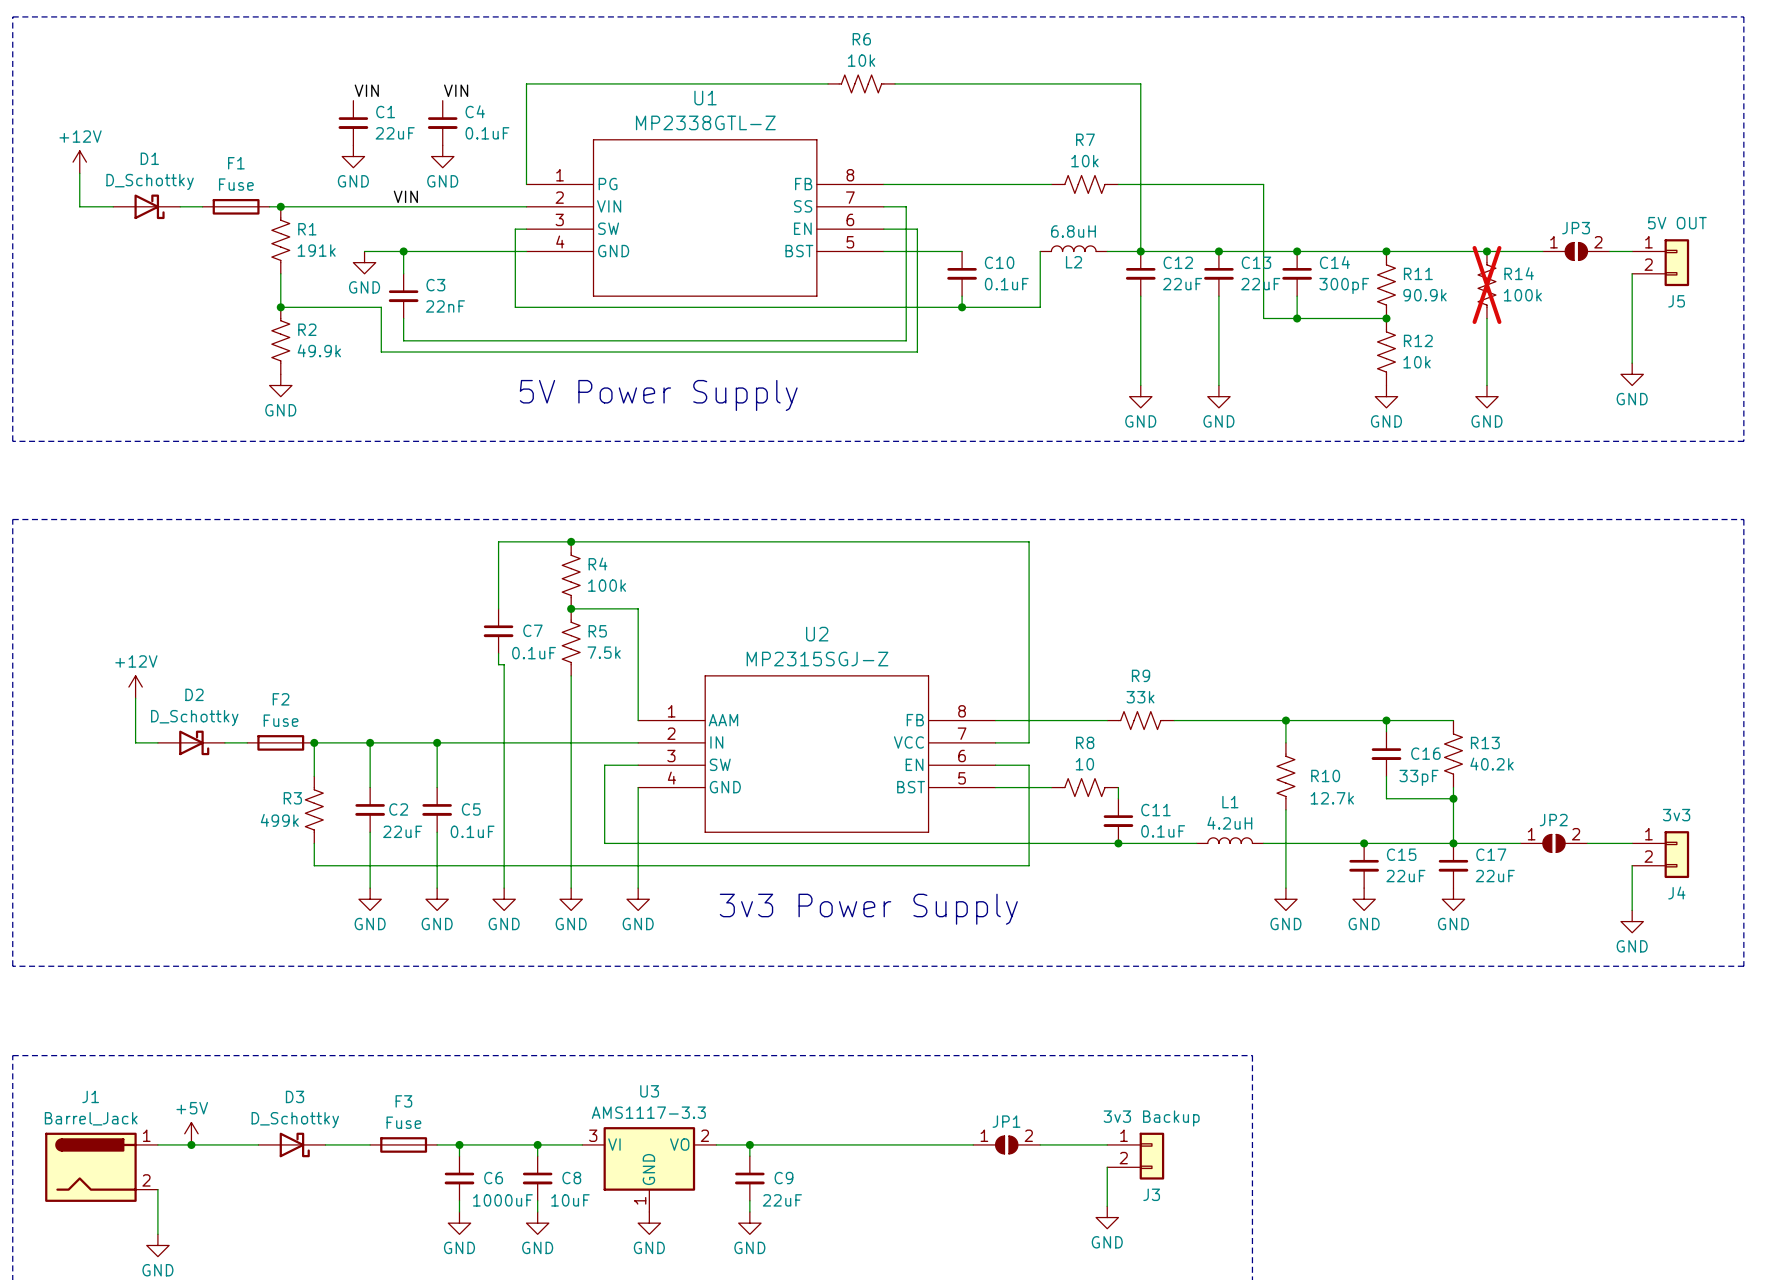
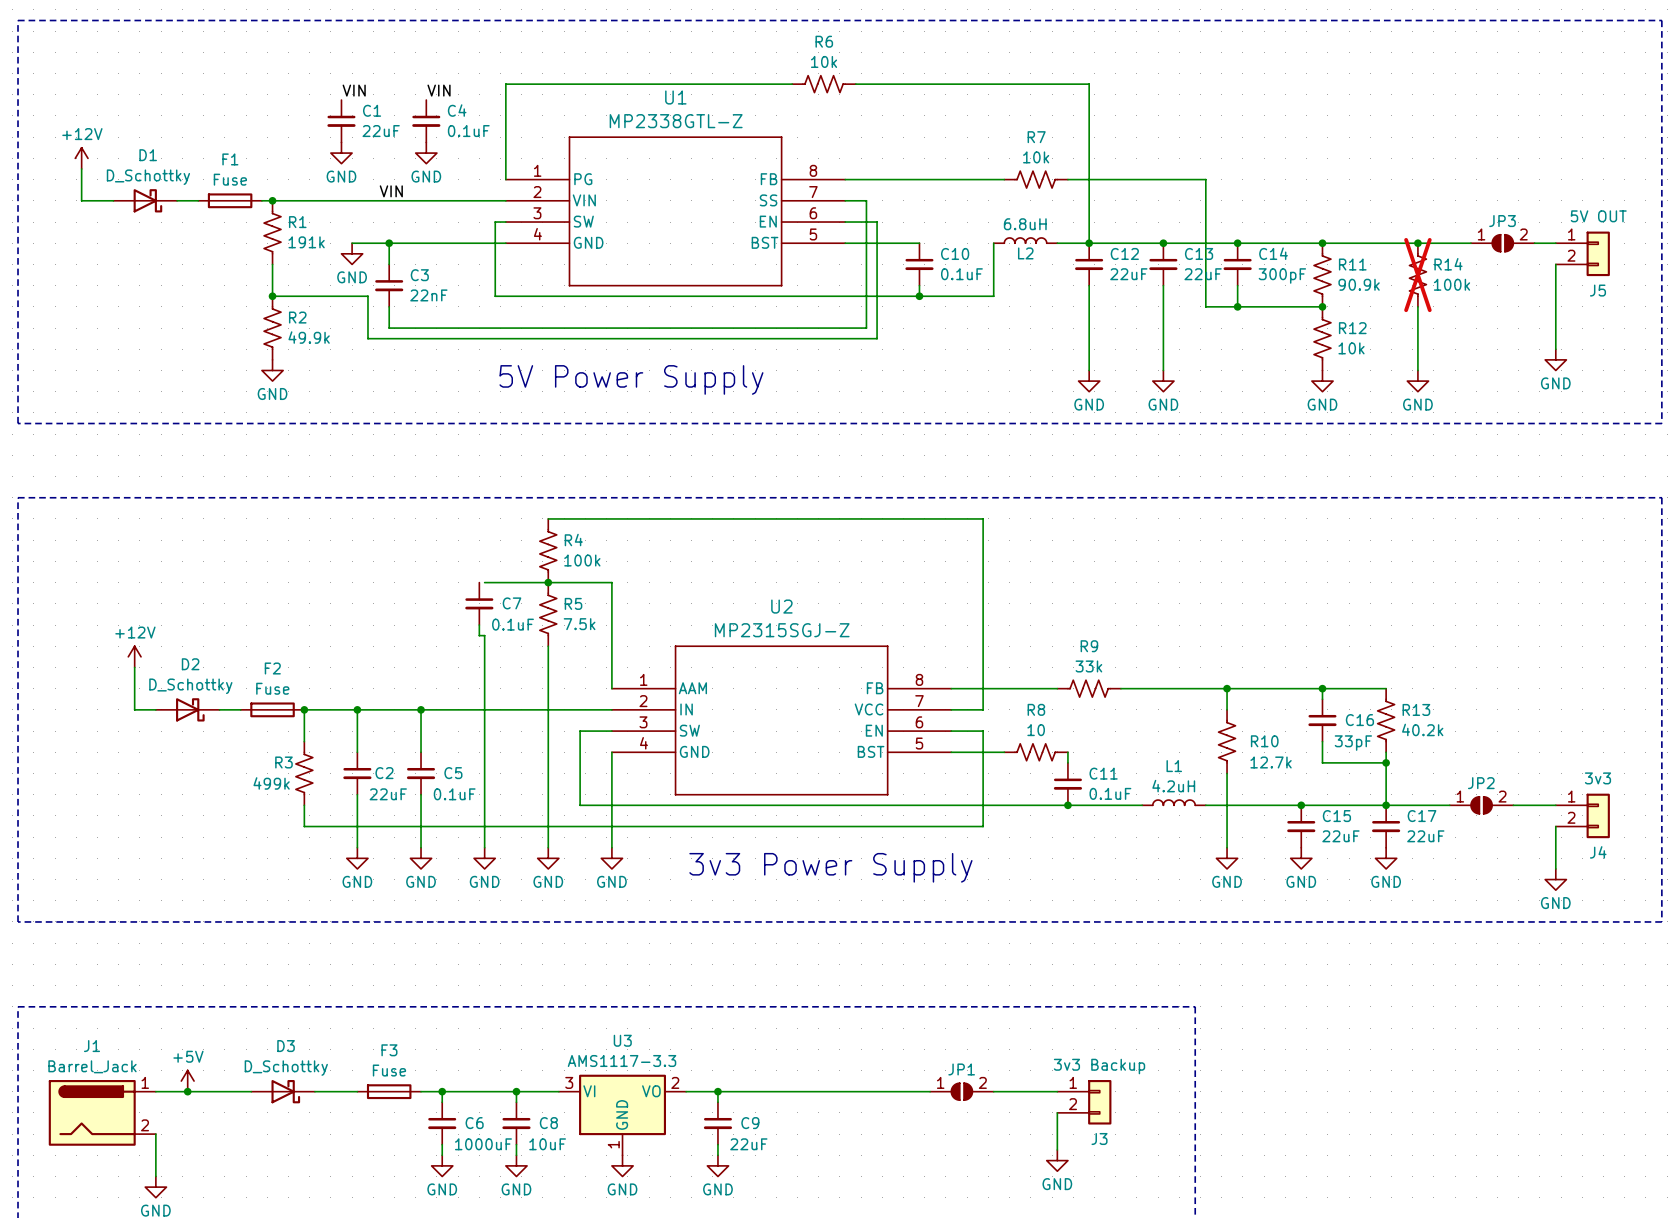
wire: (571, 541) (498, 541) (498, 608) -> none
junction: (571, 541) -> none
wire: none -> (484, 582) (548, 582)

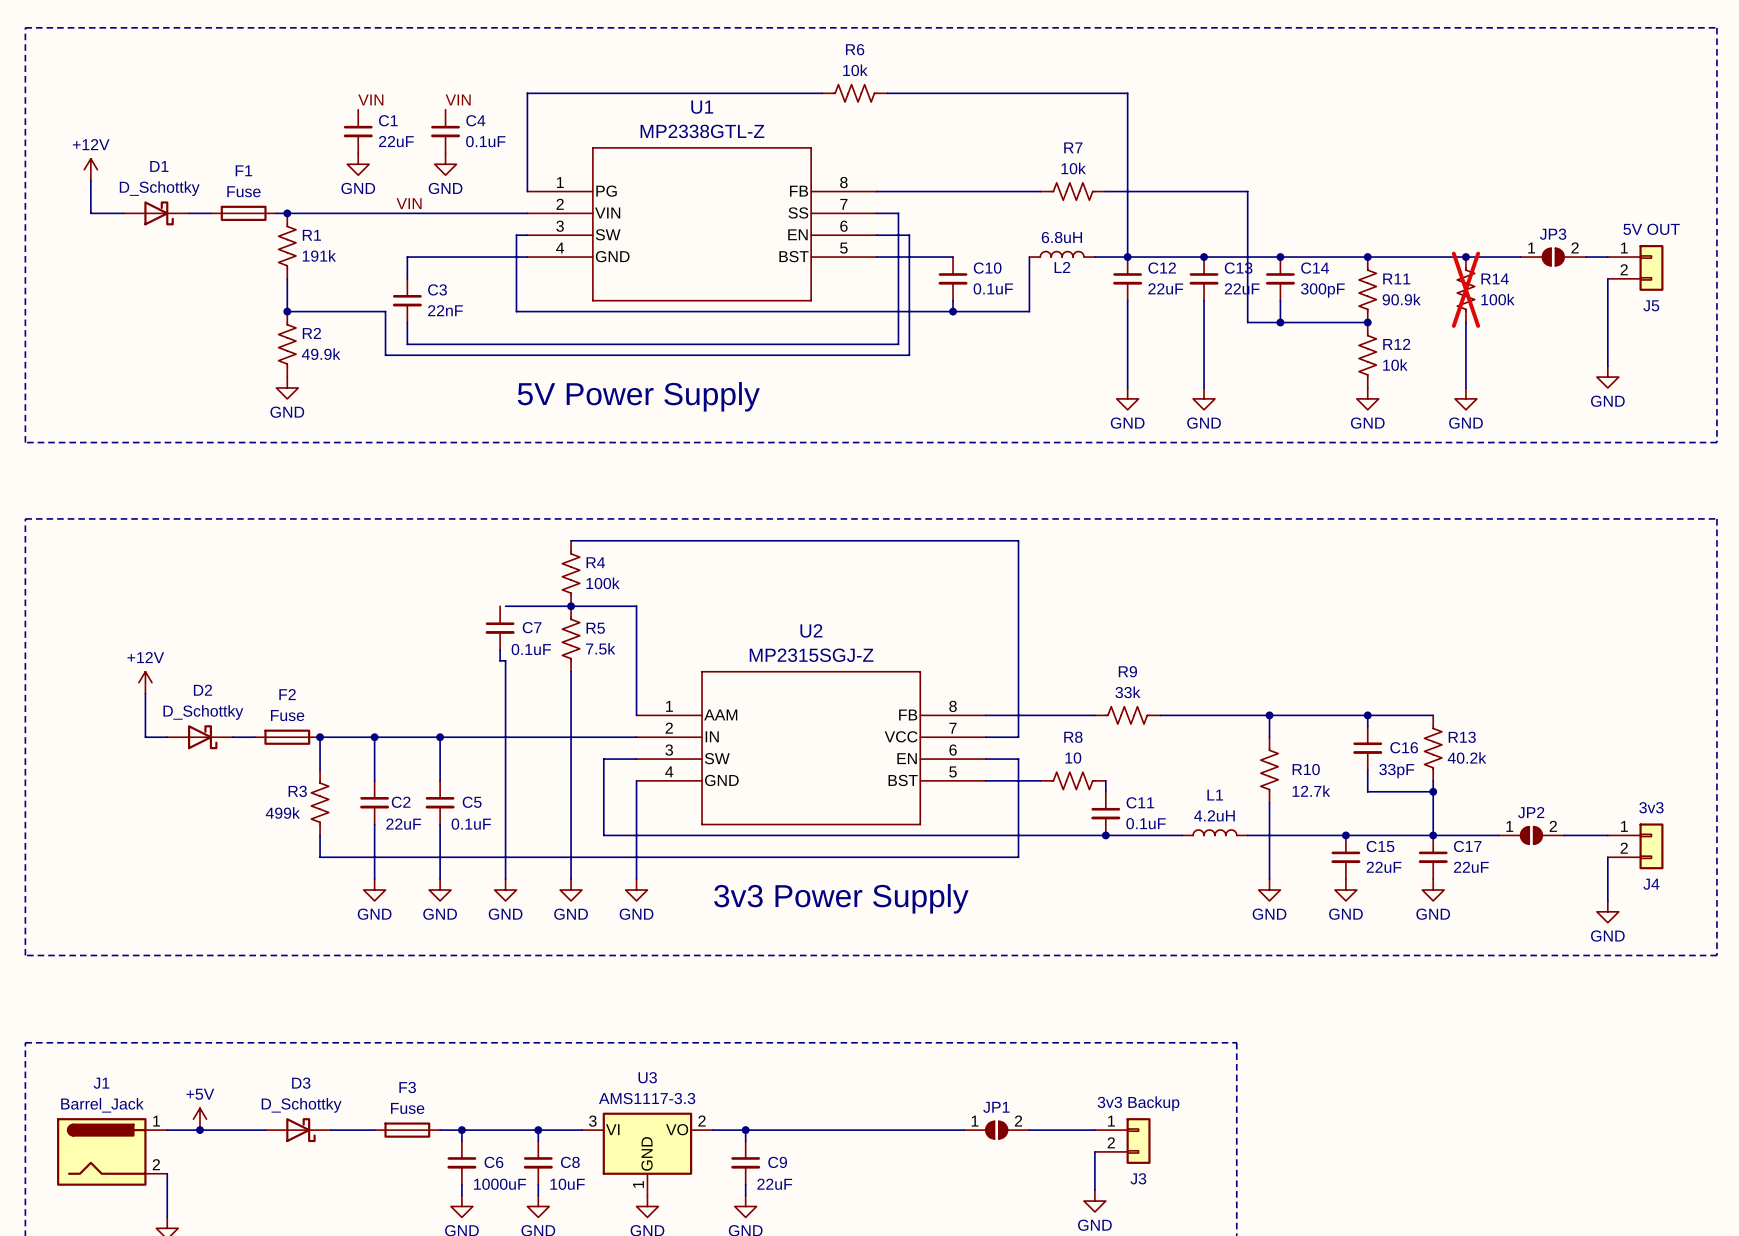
wire: (352, 243) (389, 243) -> none
junction: (389, 243) -> none
power symbol: GND (352, 253) -> none

